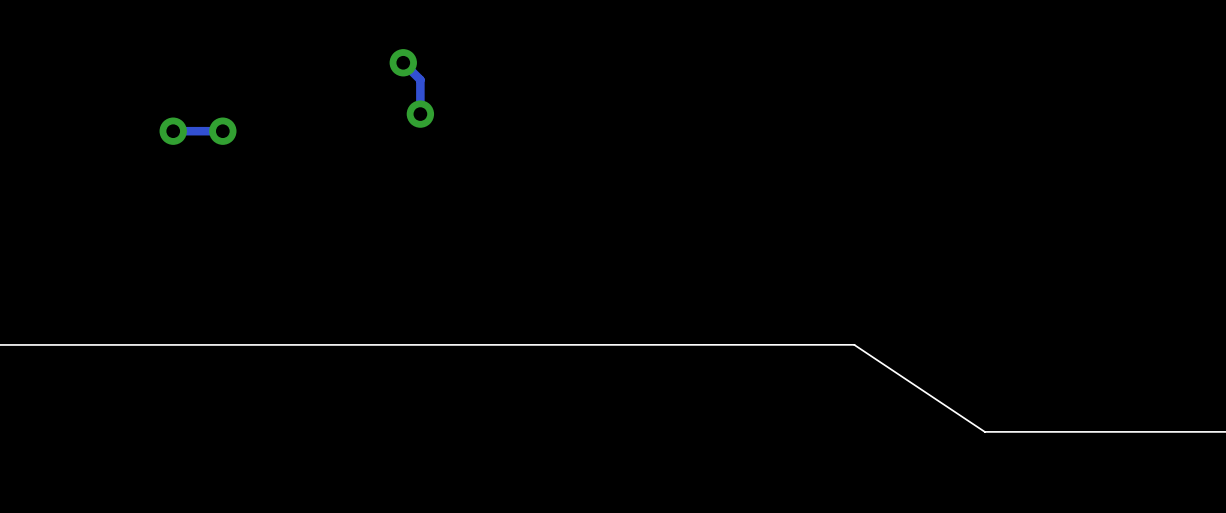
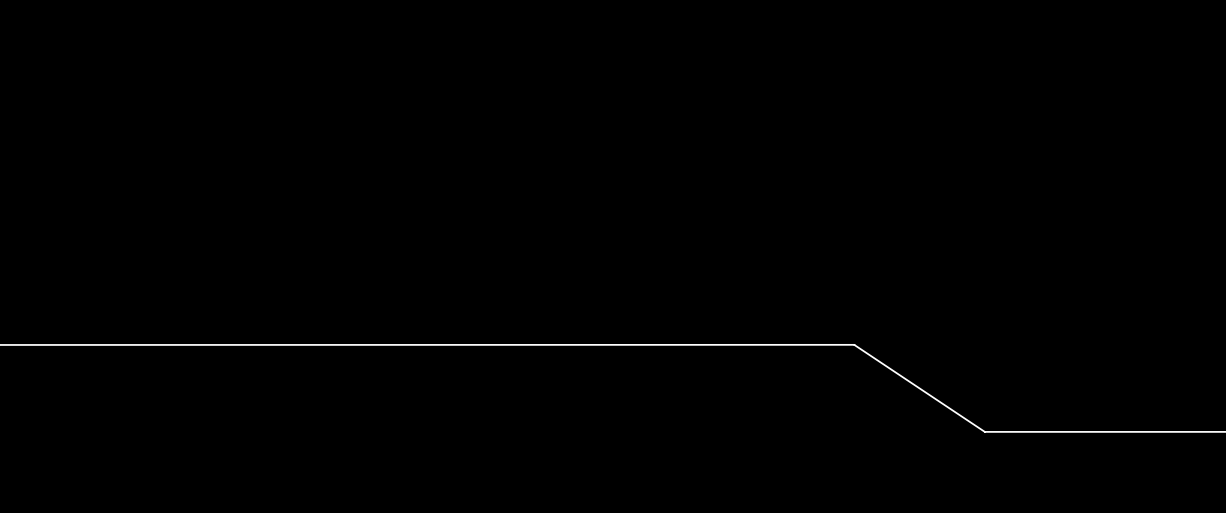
track: (403, 62) (420, 79) (420, 114) -> none
via: (403, 62) -> none
via: (420, 114) -> none
via: (173, 131) -> none
track: (222, 131) (173, 131) -> none
via: (222, 131) -> none

